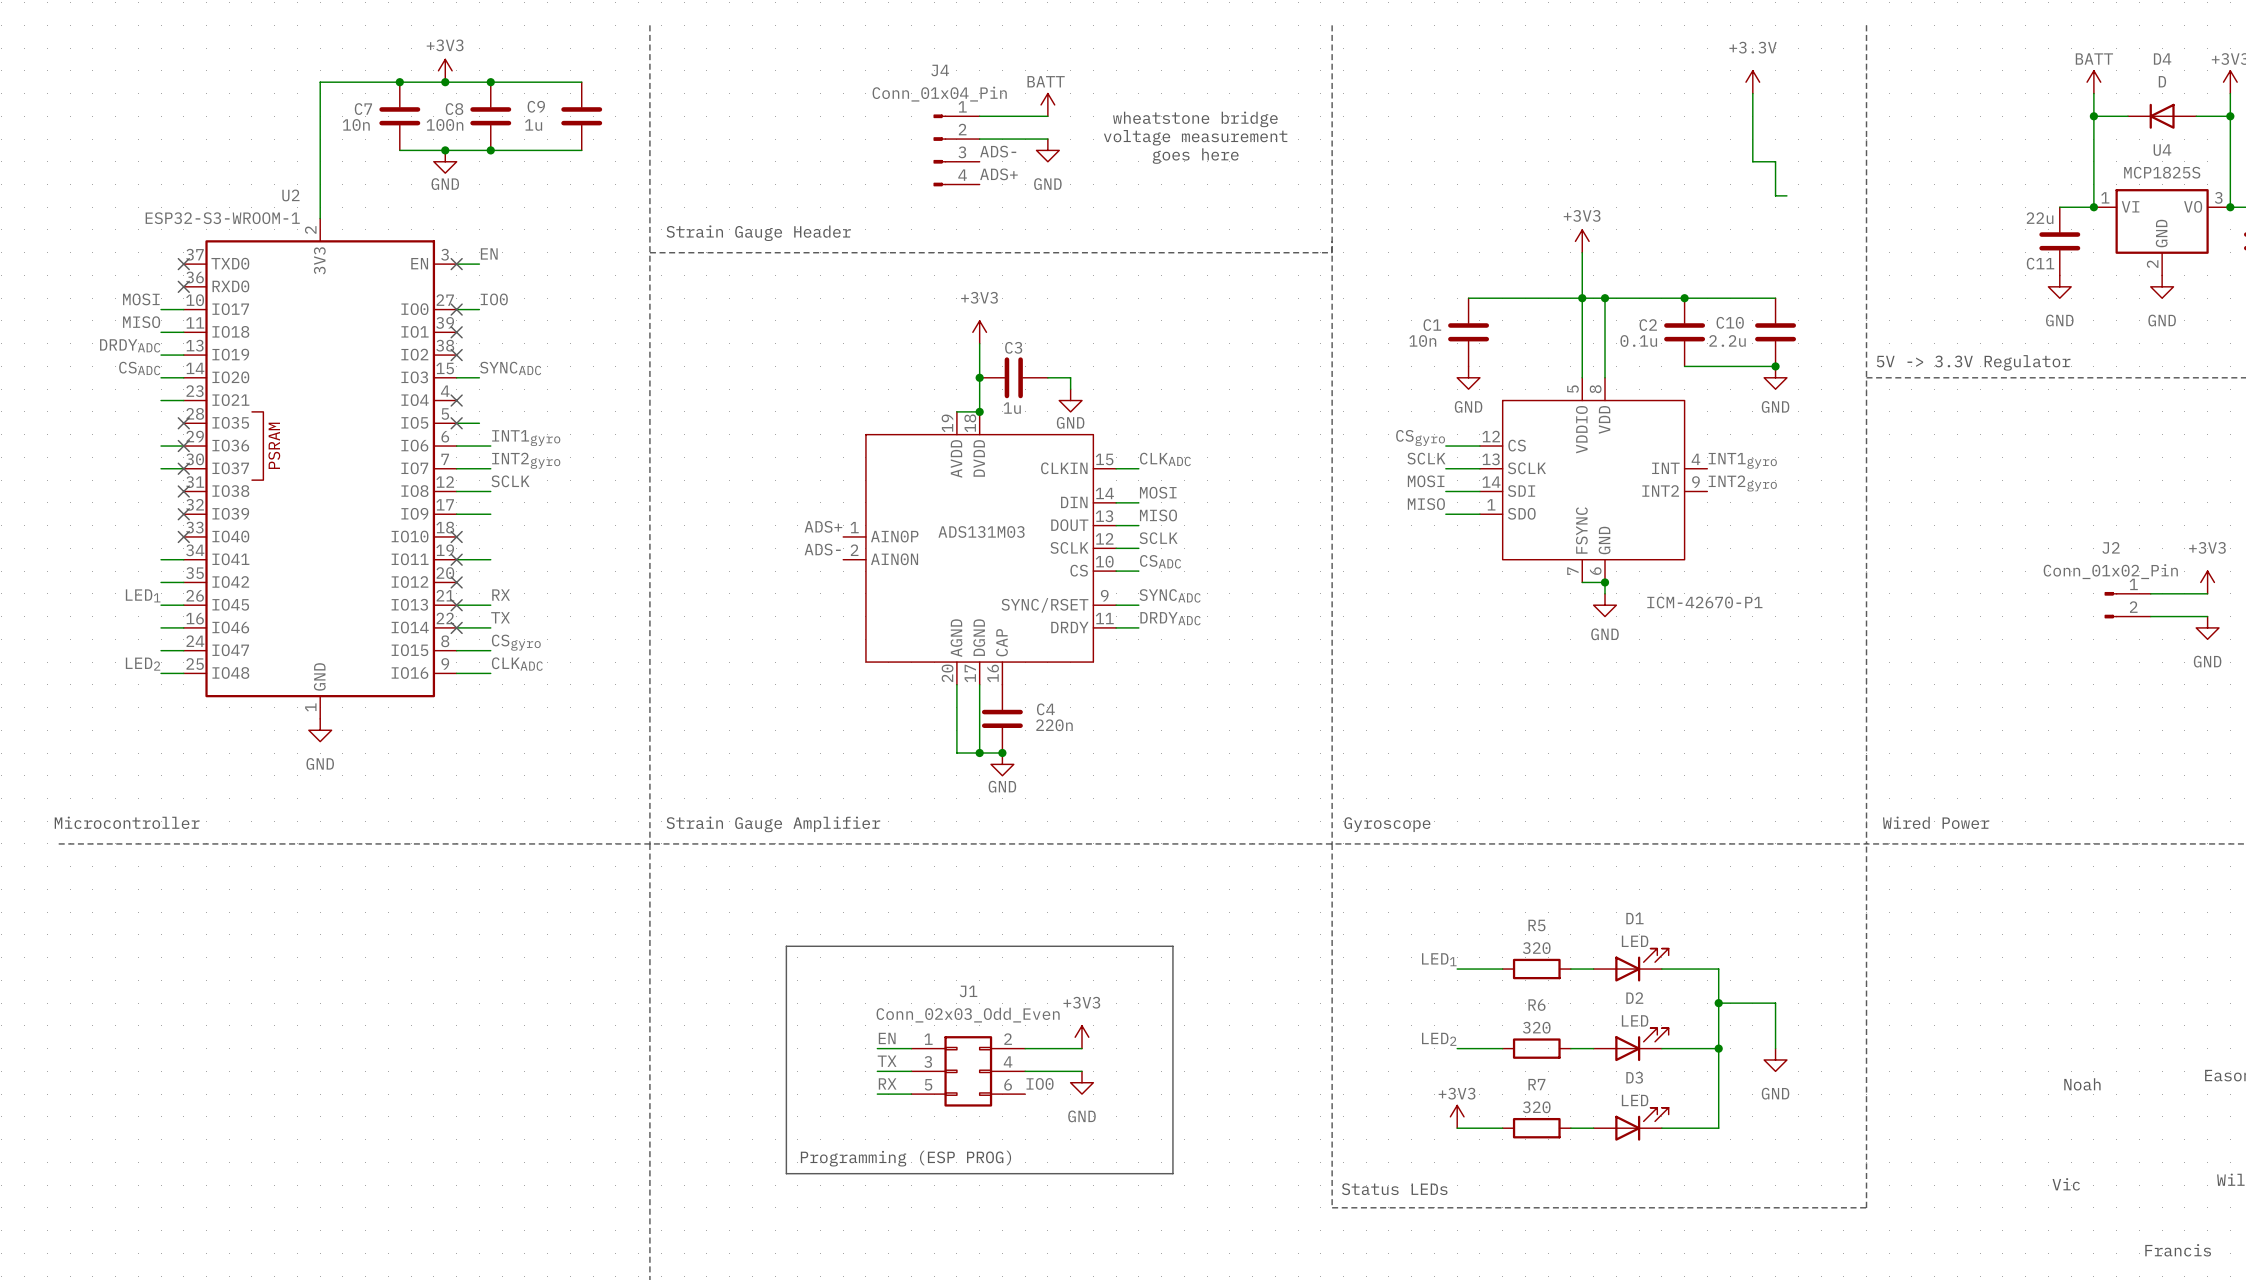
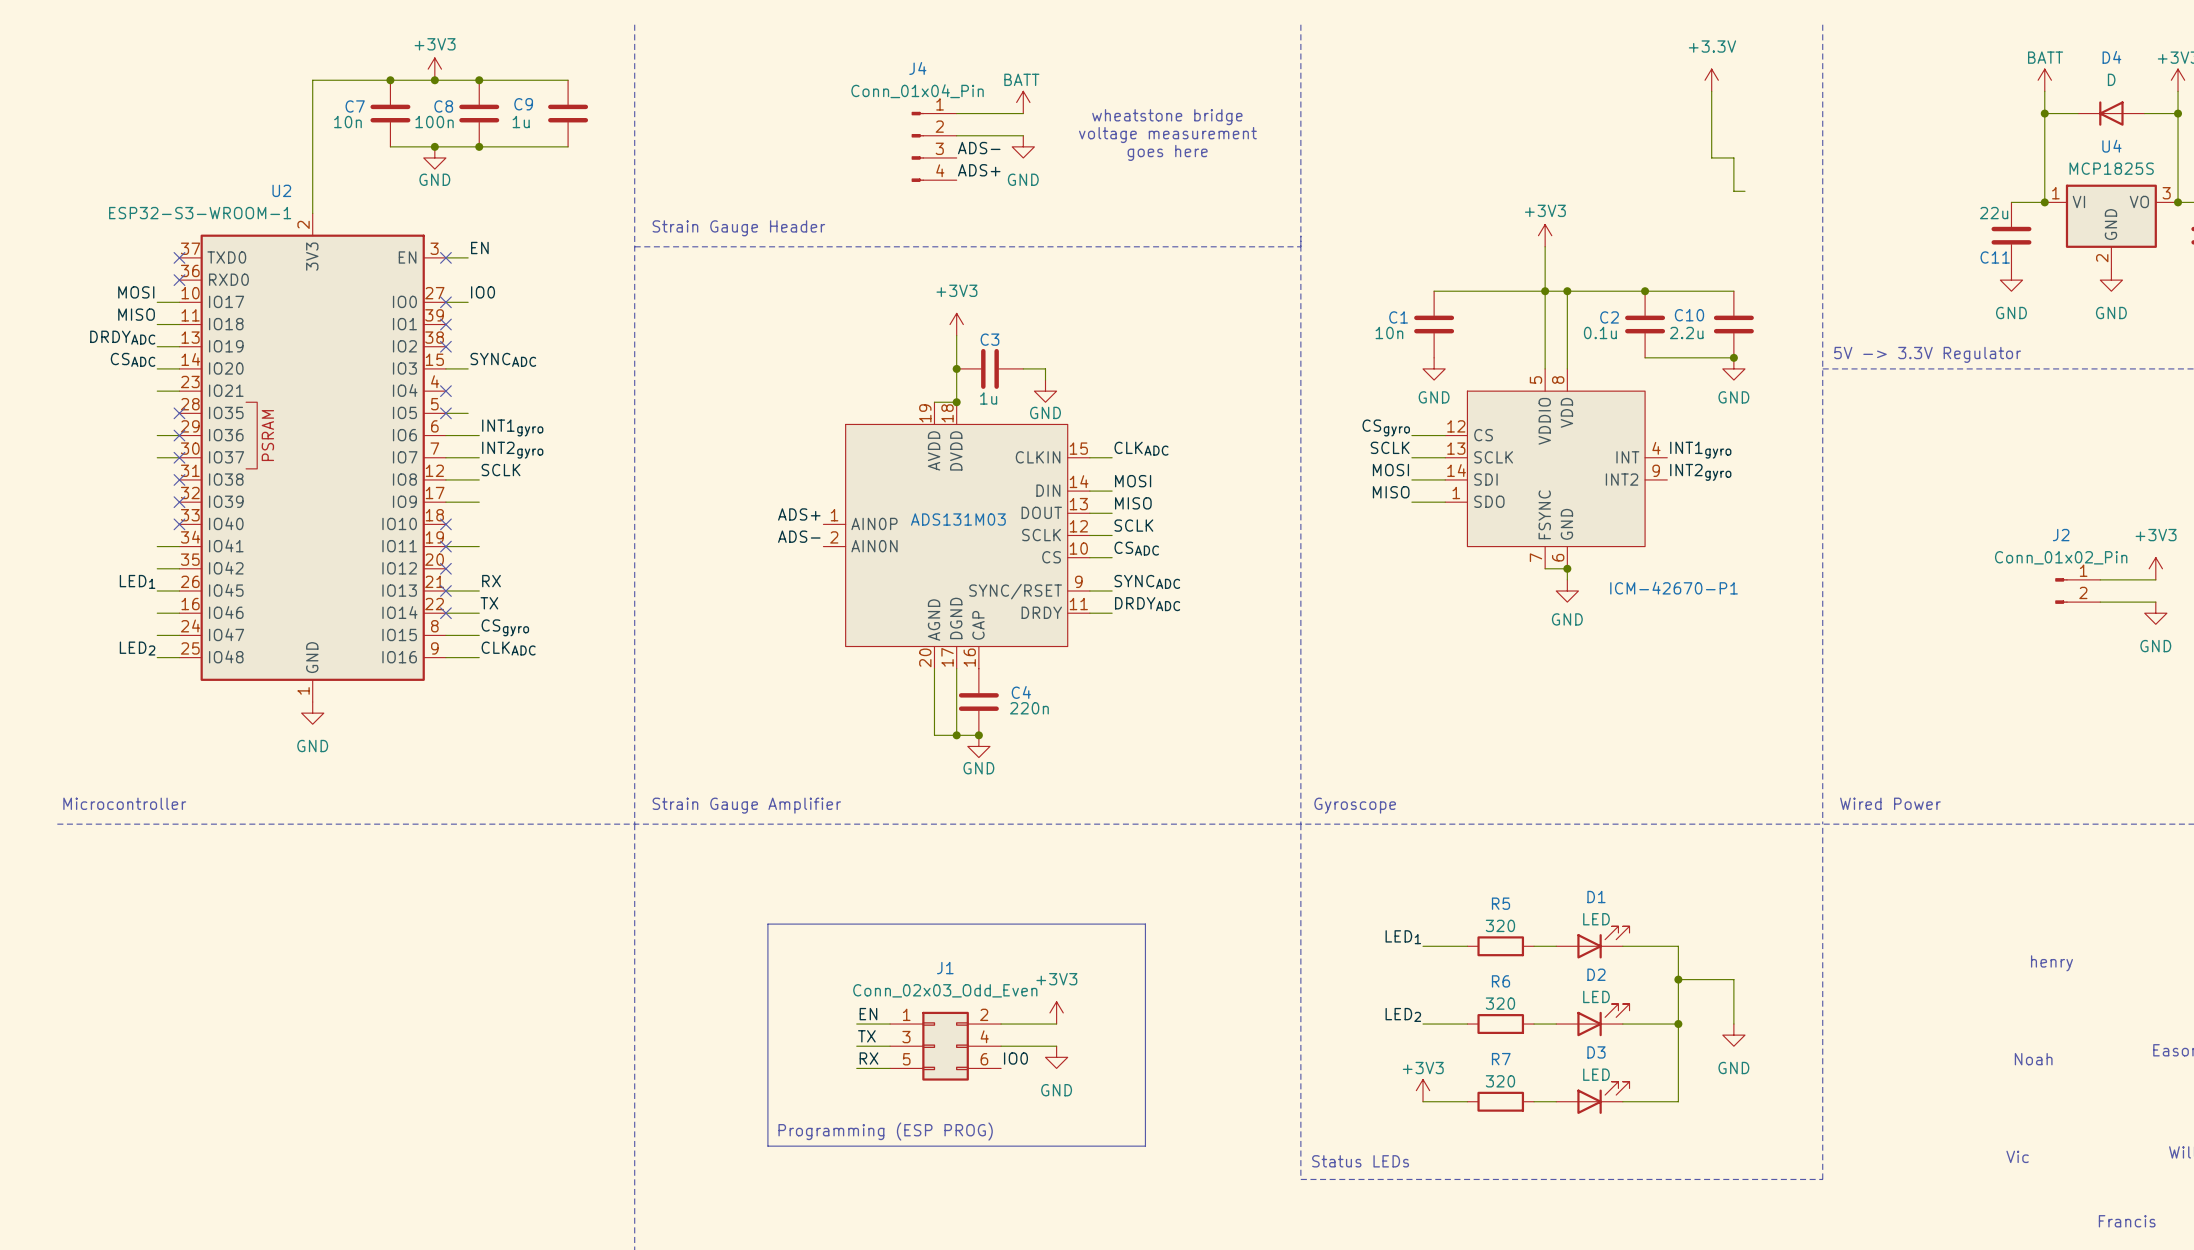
text: none -> henry (2051, 963)

